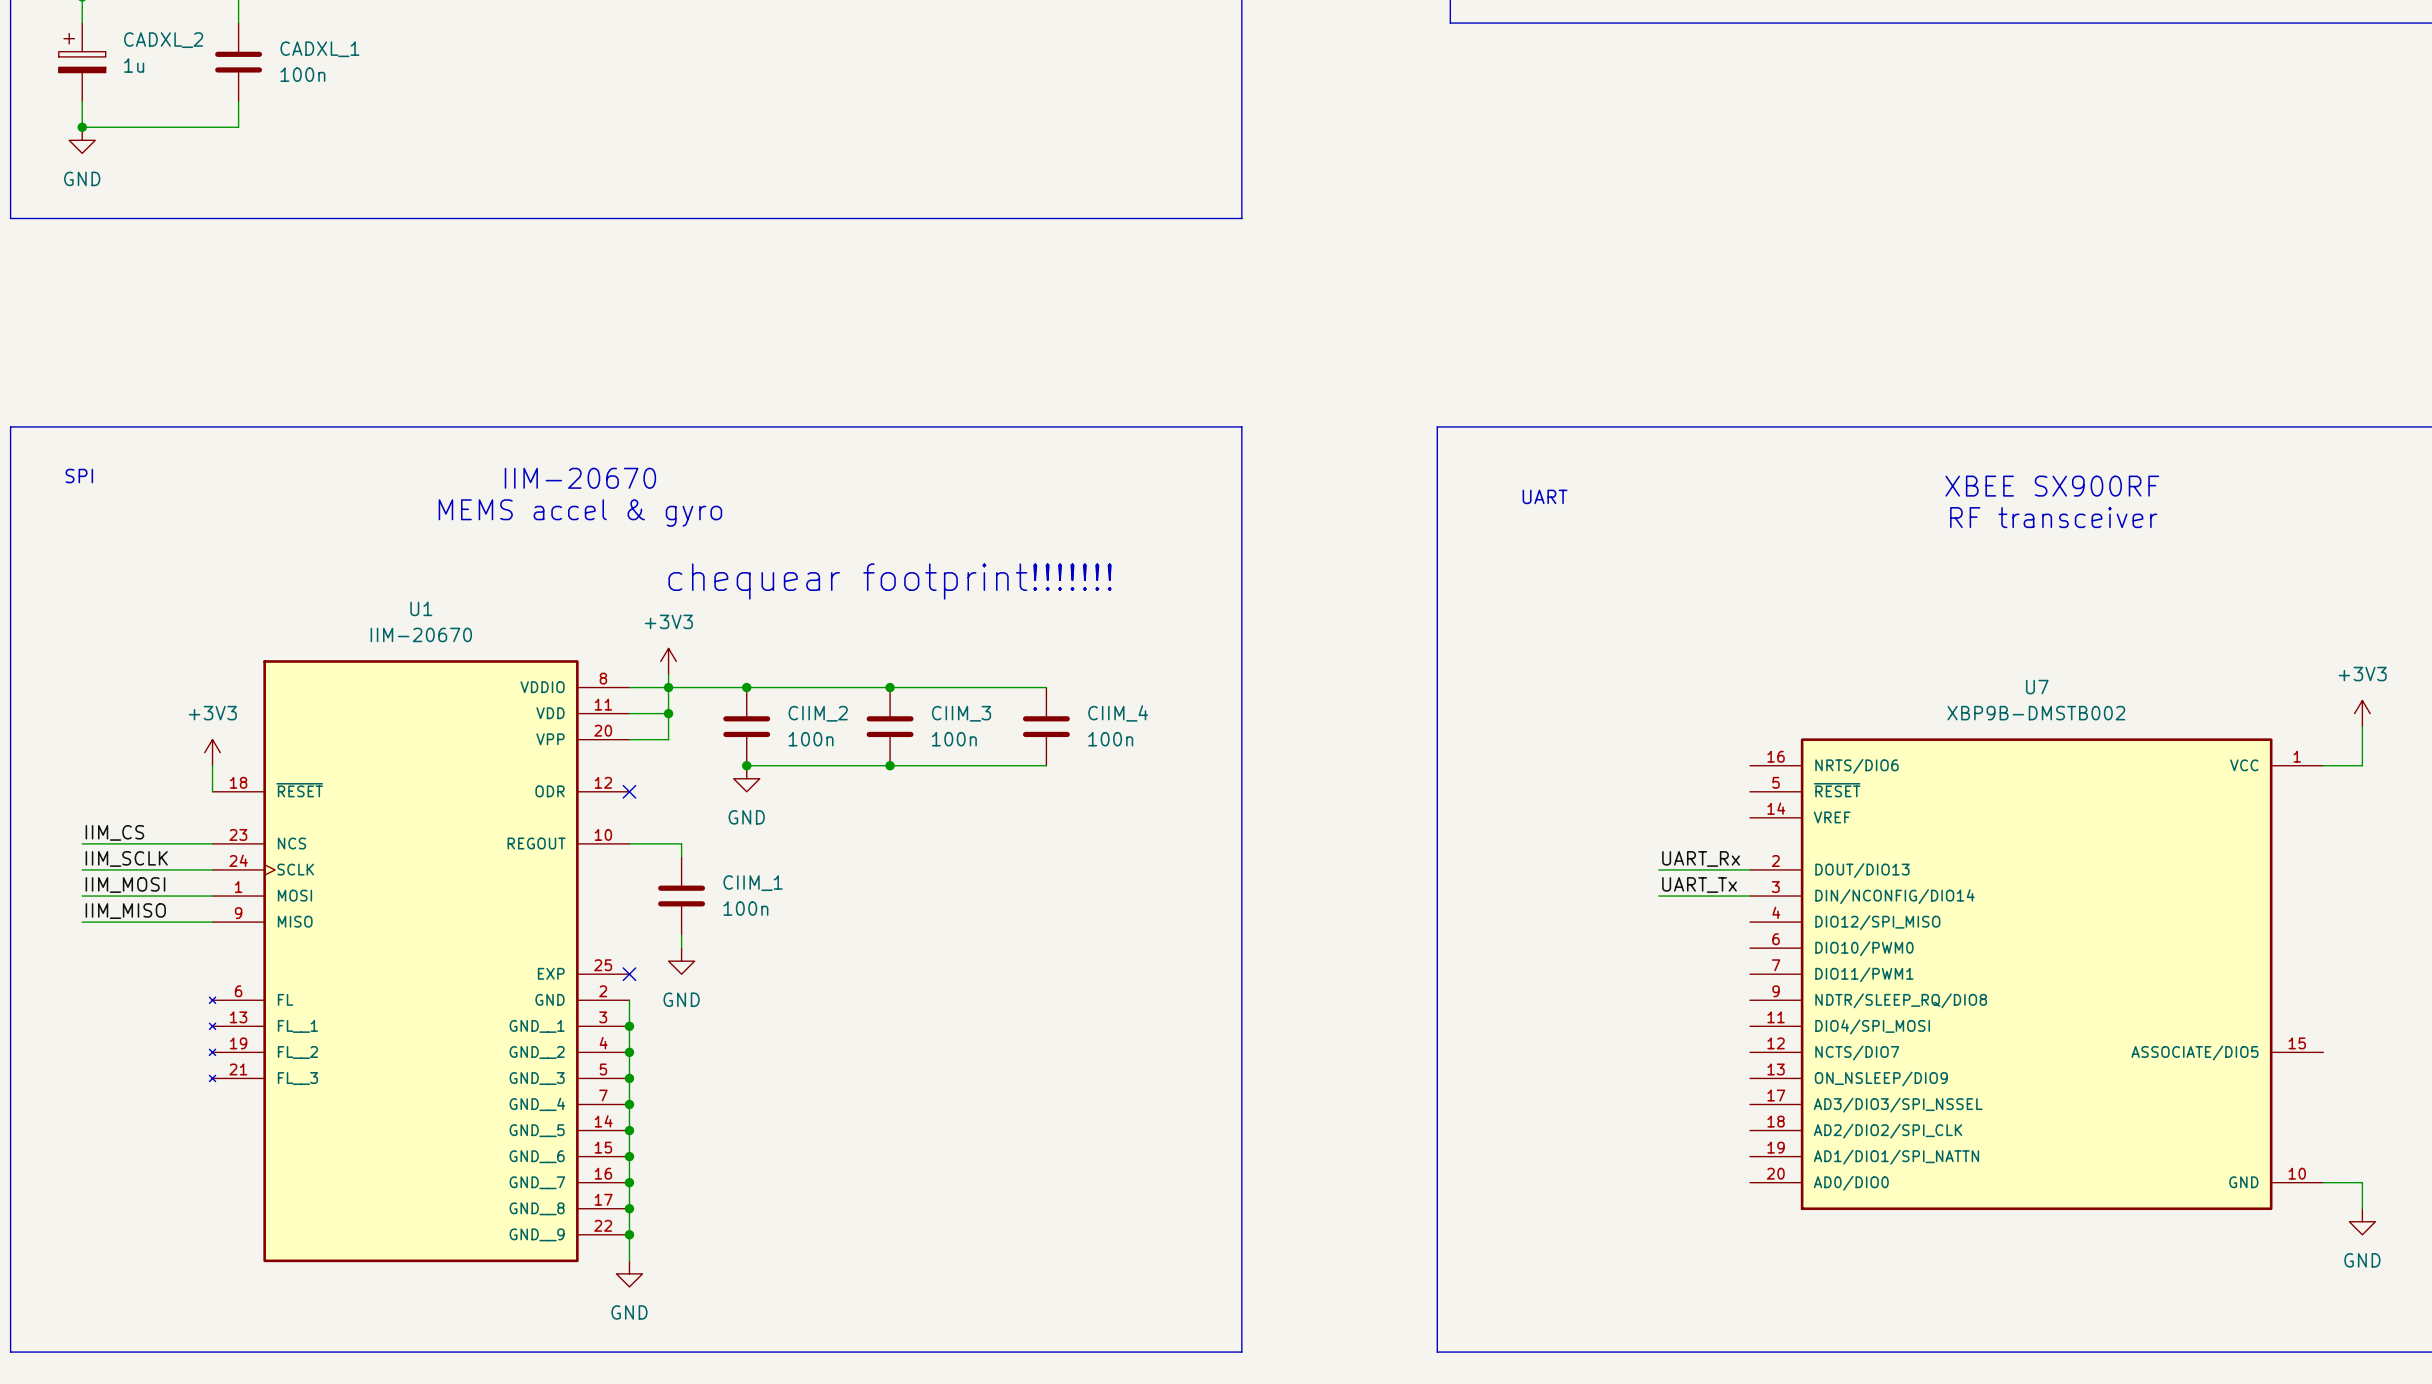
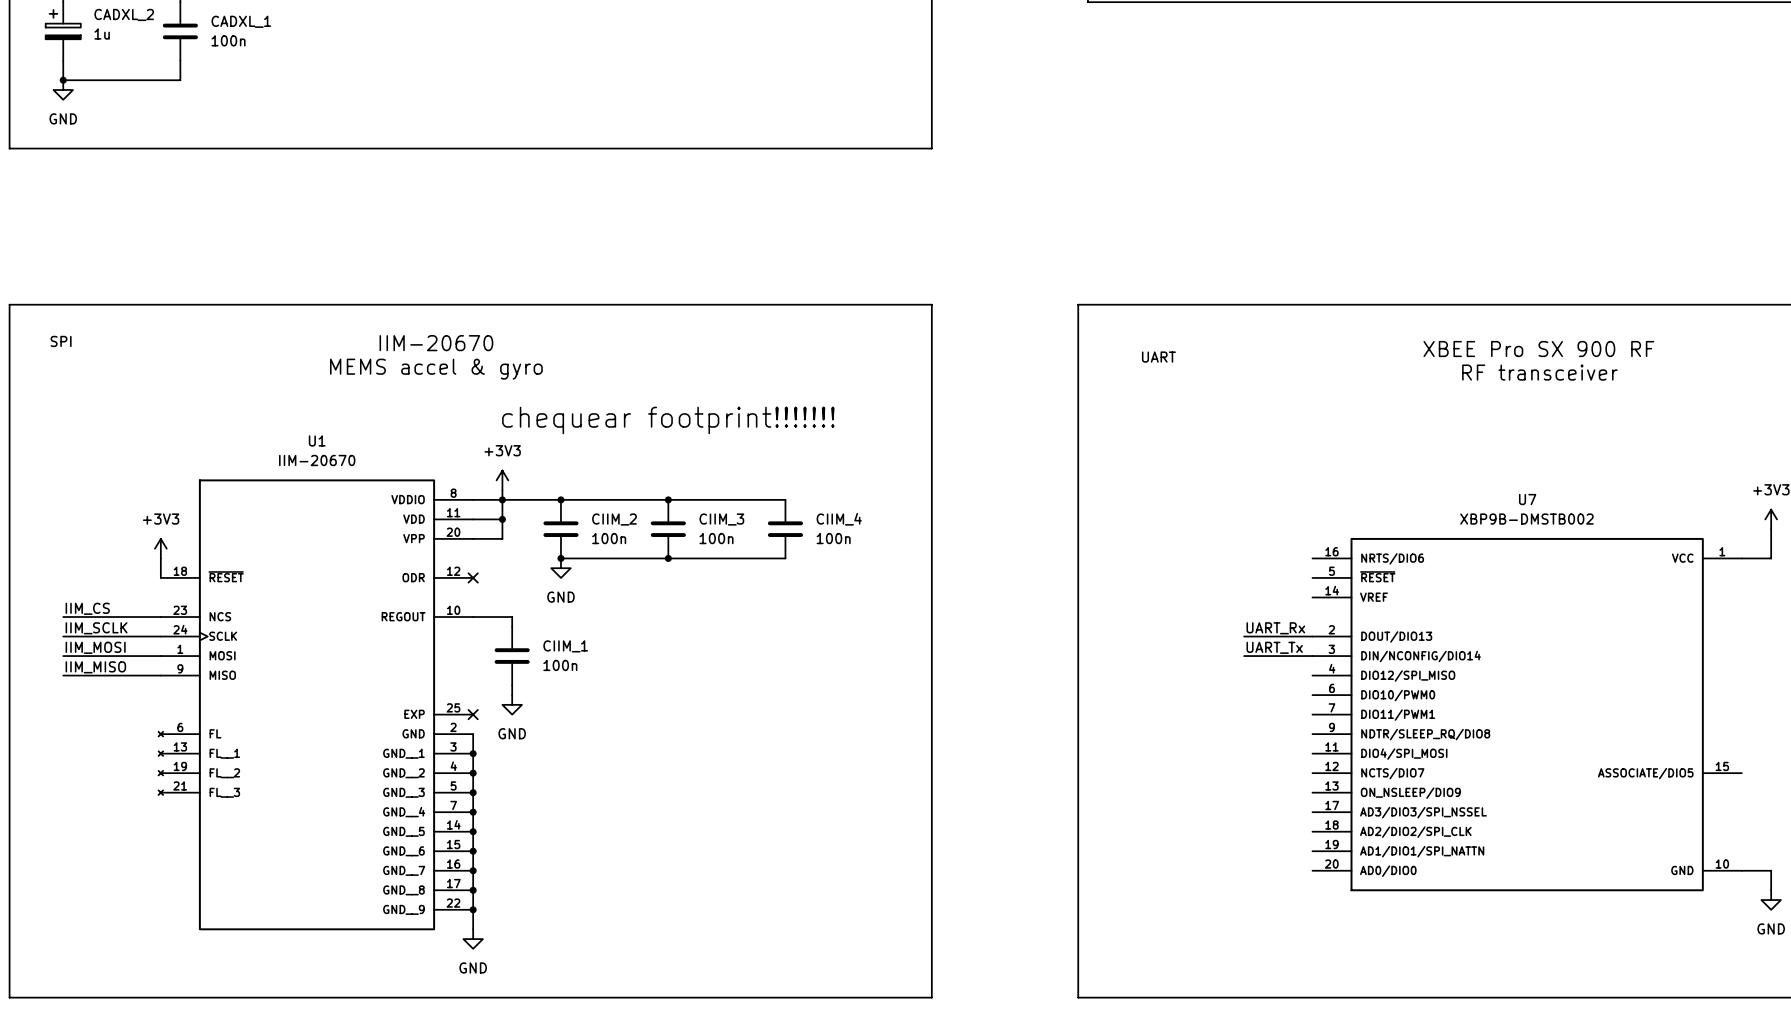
text: XBEE SX900RF (2052, 486) -> XBEE Pro SX 900 RF (1538, 349)

